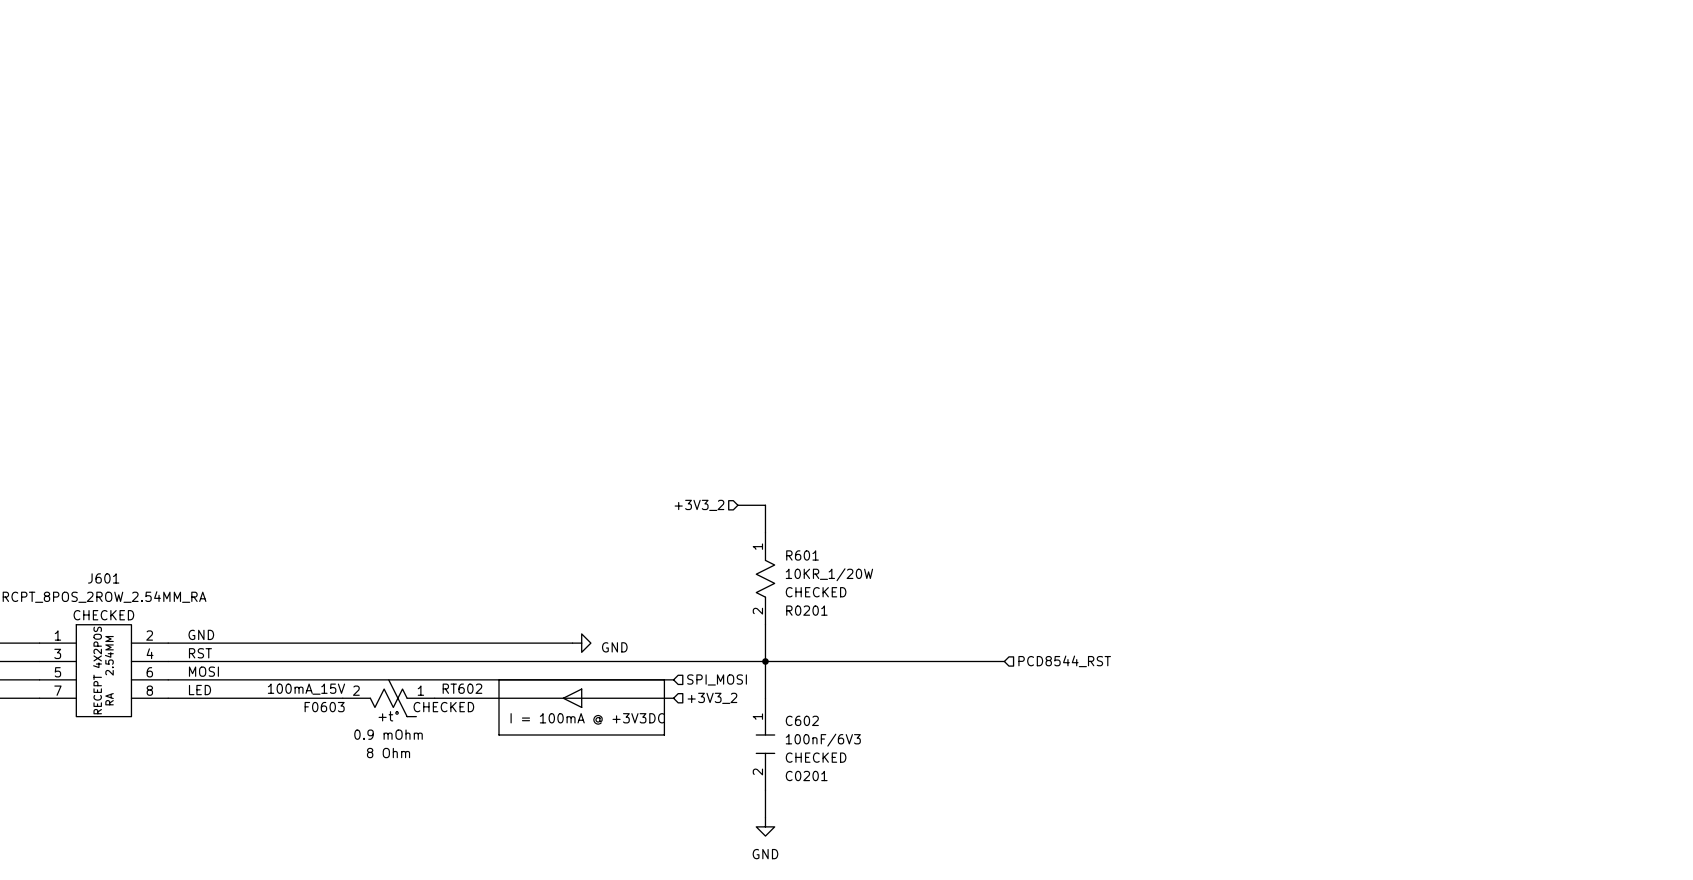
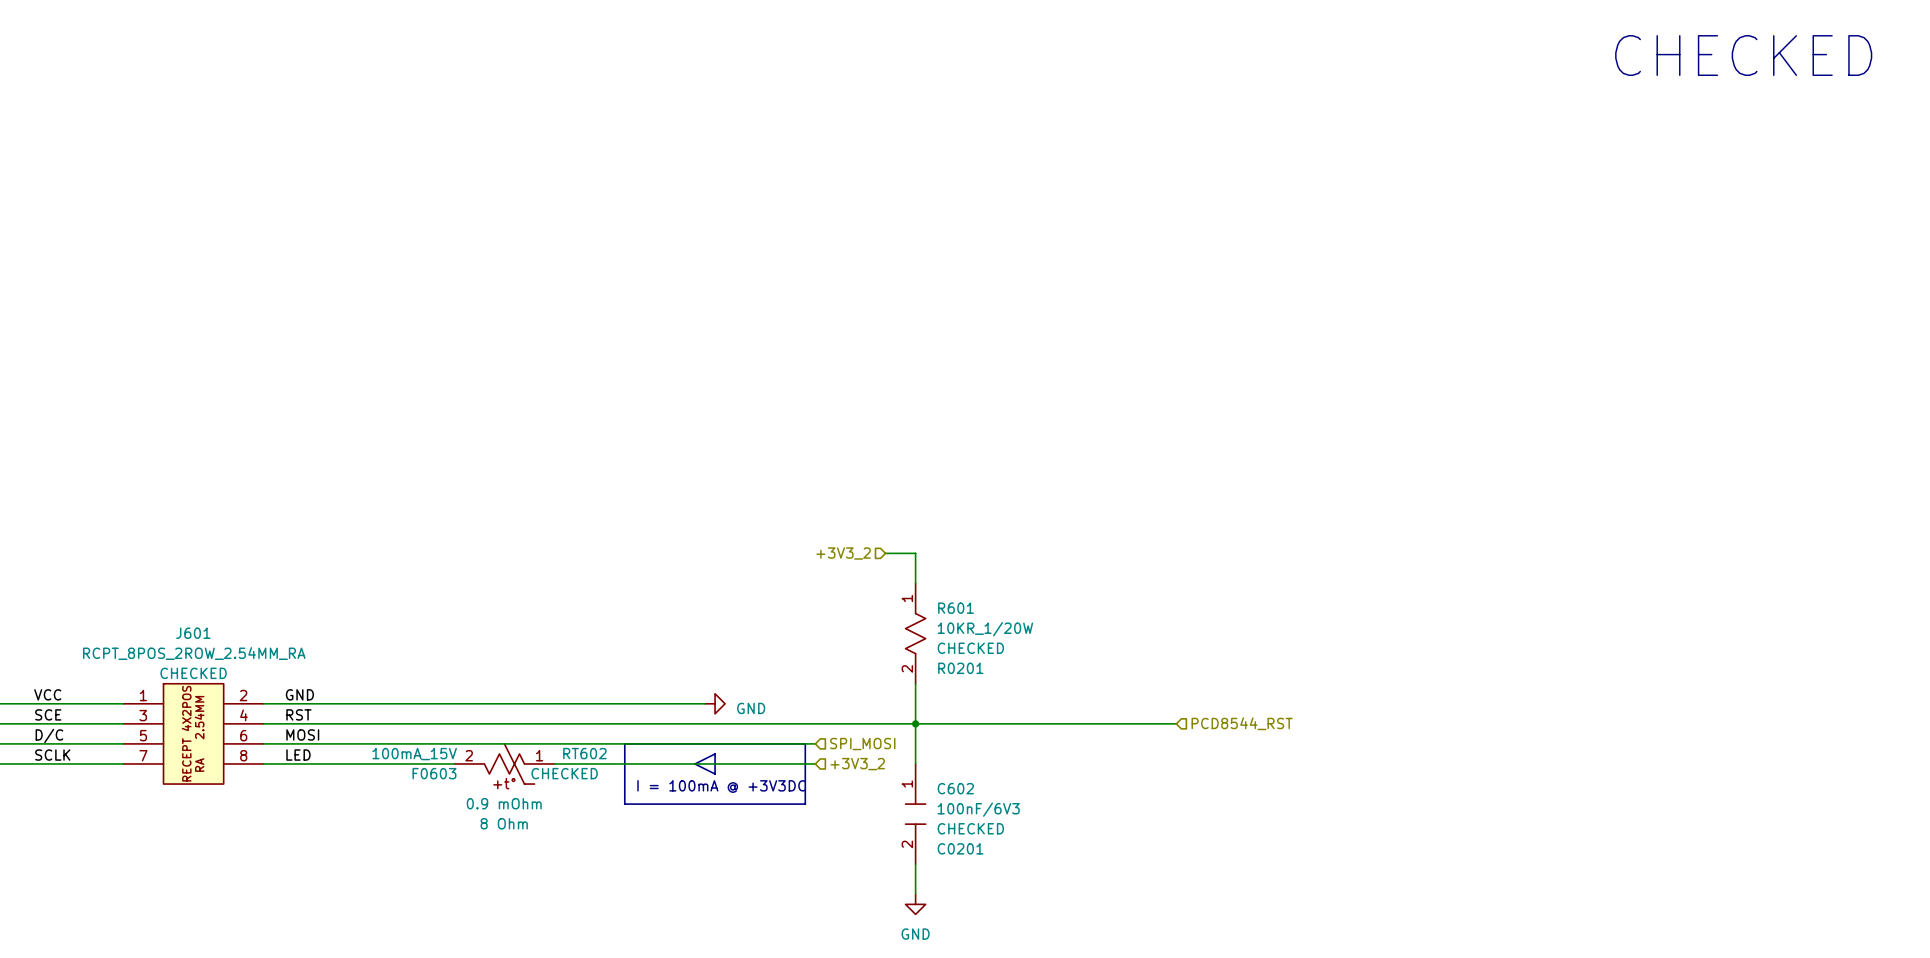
text: none -> CHECKED (1743, 55)

